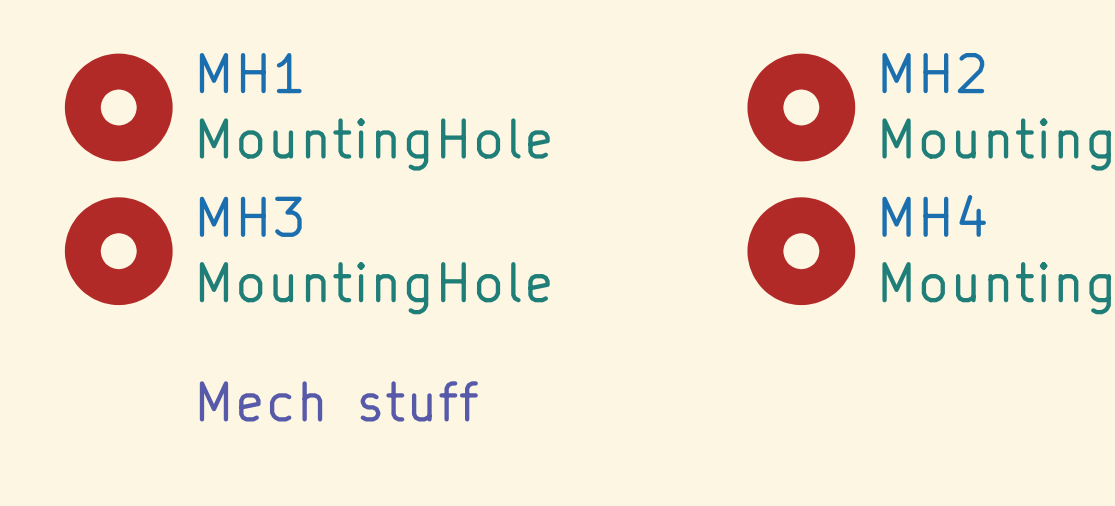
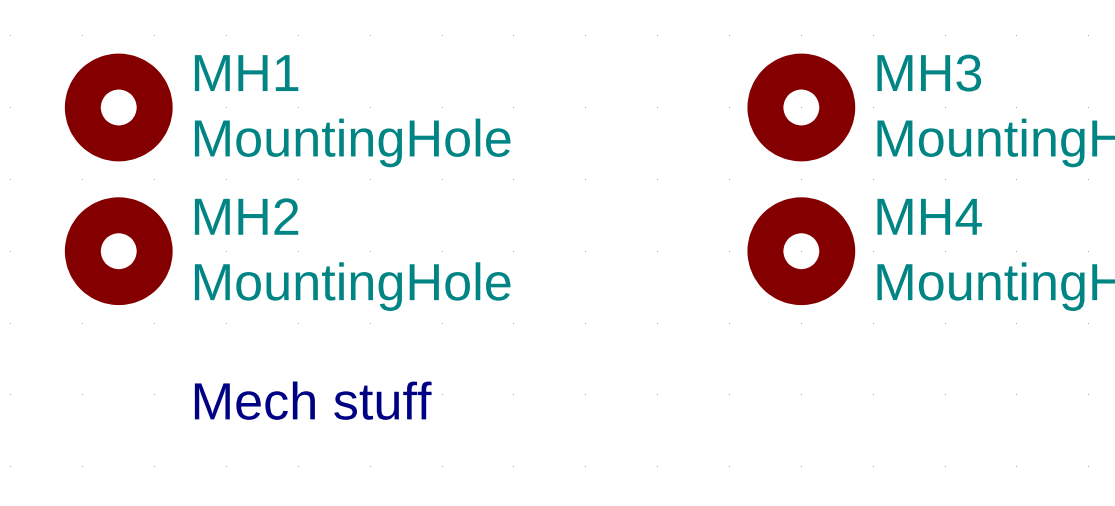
MH2 name: MH2 (933, 73) -> MH3 (929, 73)
MH3 name: MH3 (250, 216) -> MH2 (246, 216)

